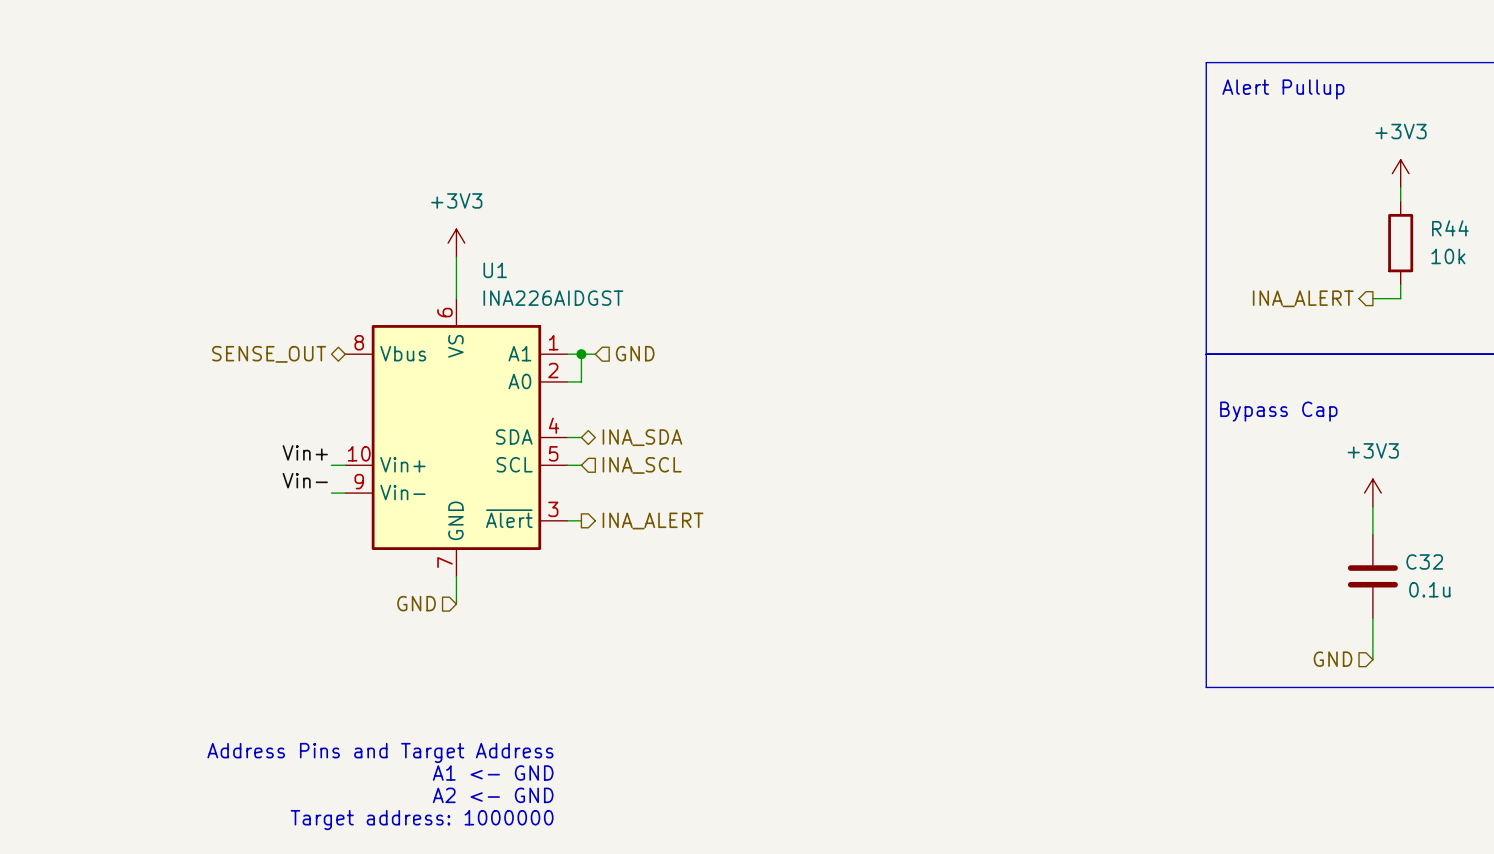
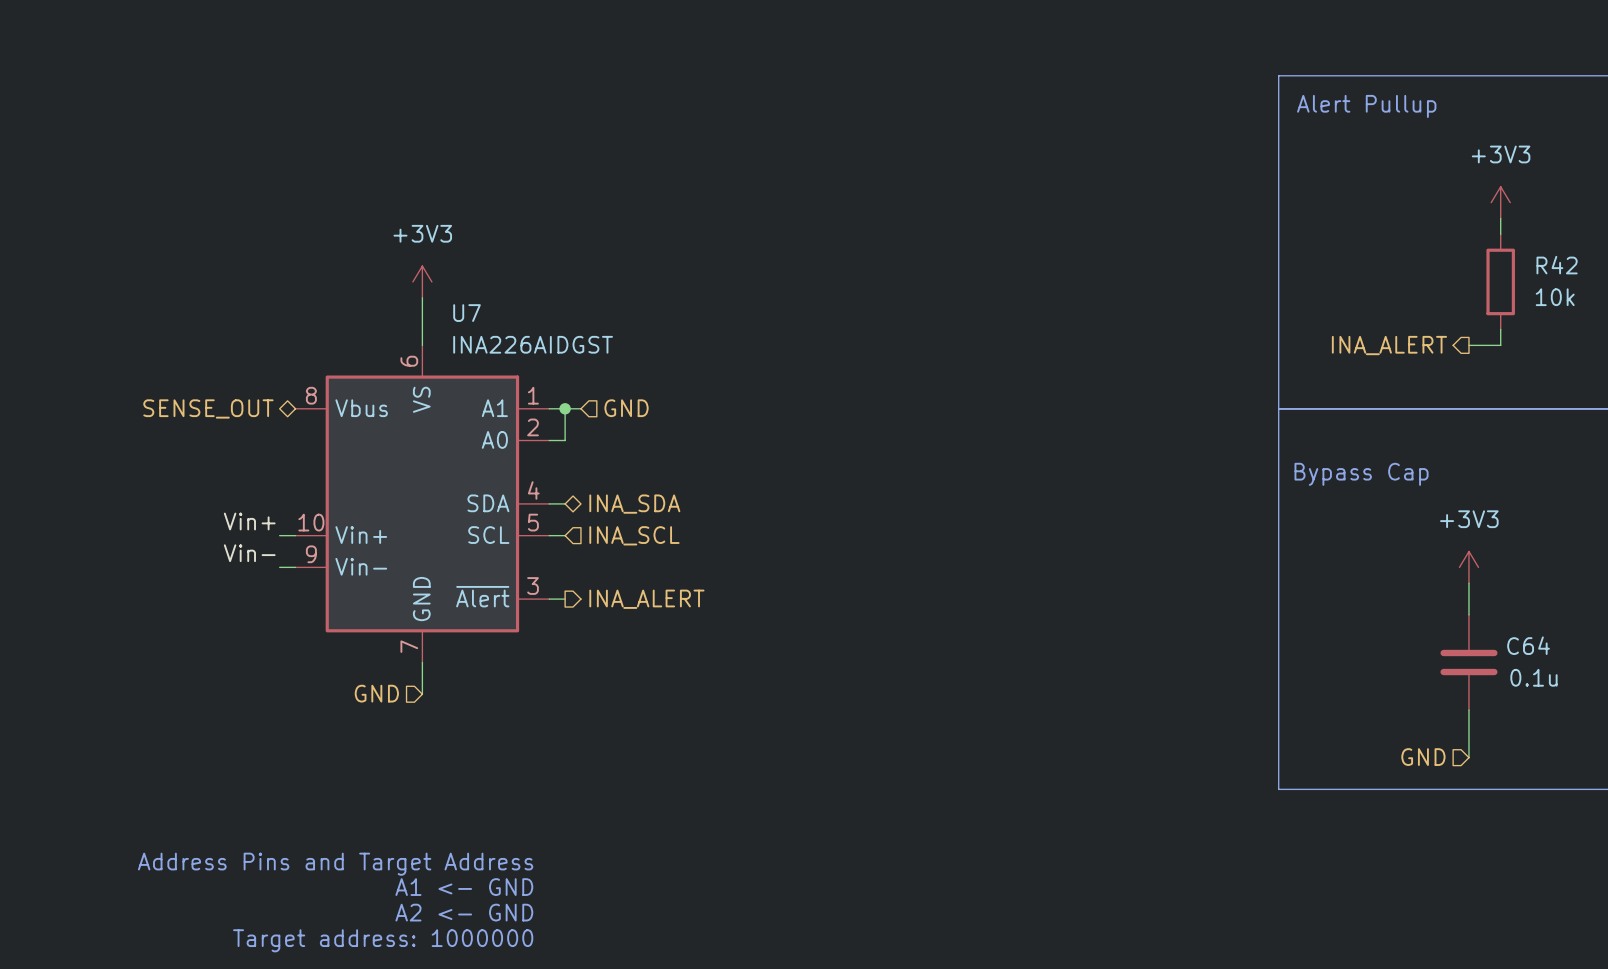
R44 name: R44 (1450, 228) -> R42 (1557, 265)
U1 name: U1 (495, 270) -> U7 (467, 313)
C32 name: C32 (1424, 561) -> C64 (1528, 645)

